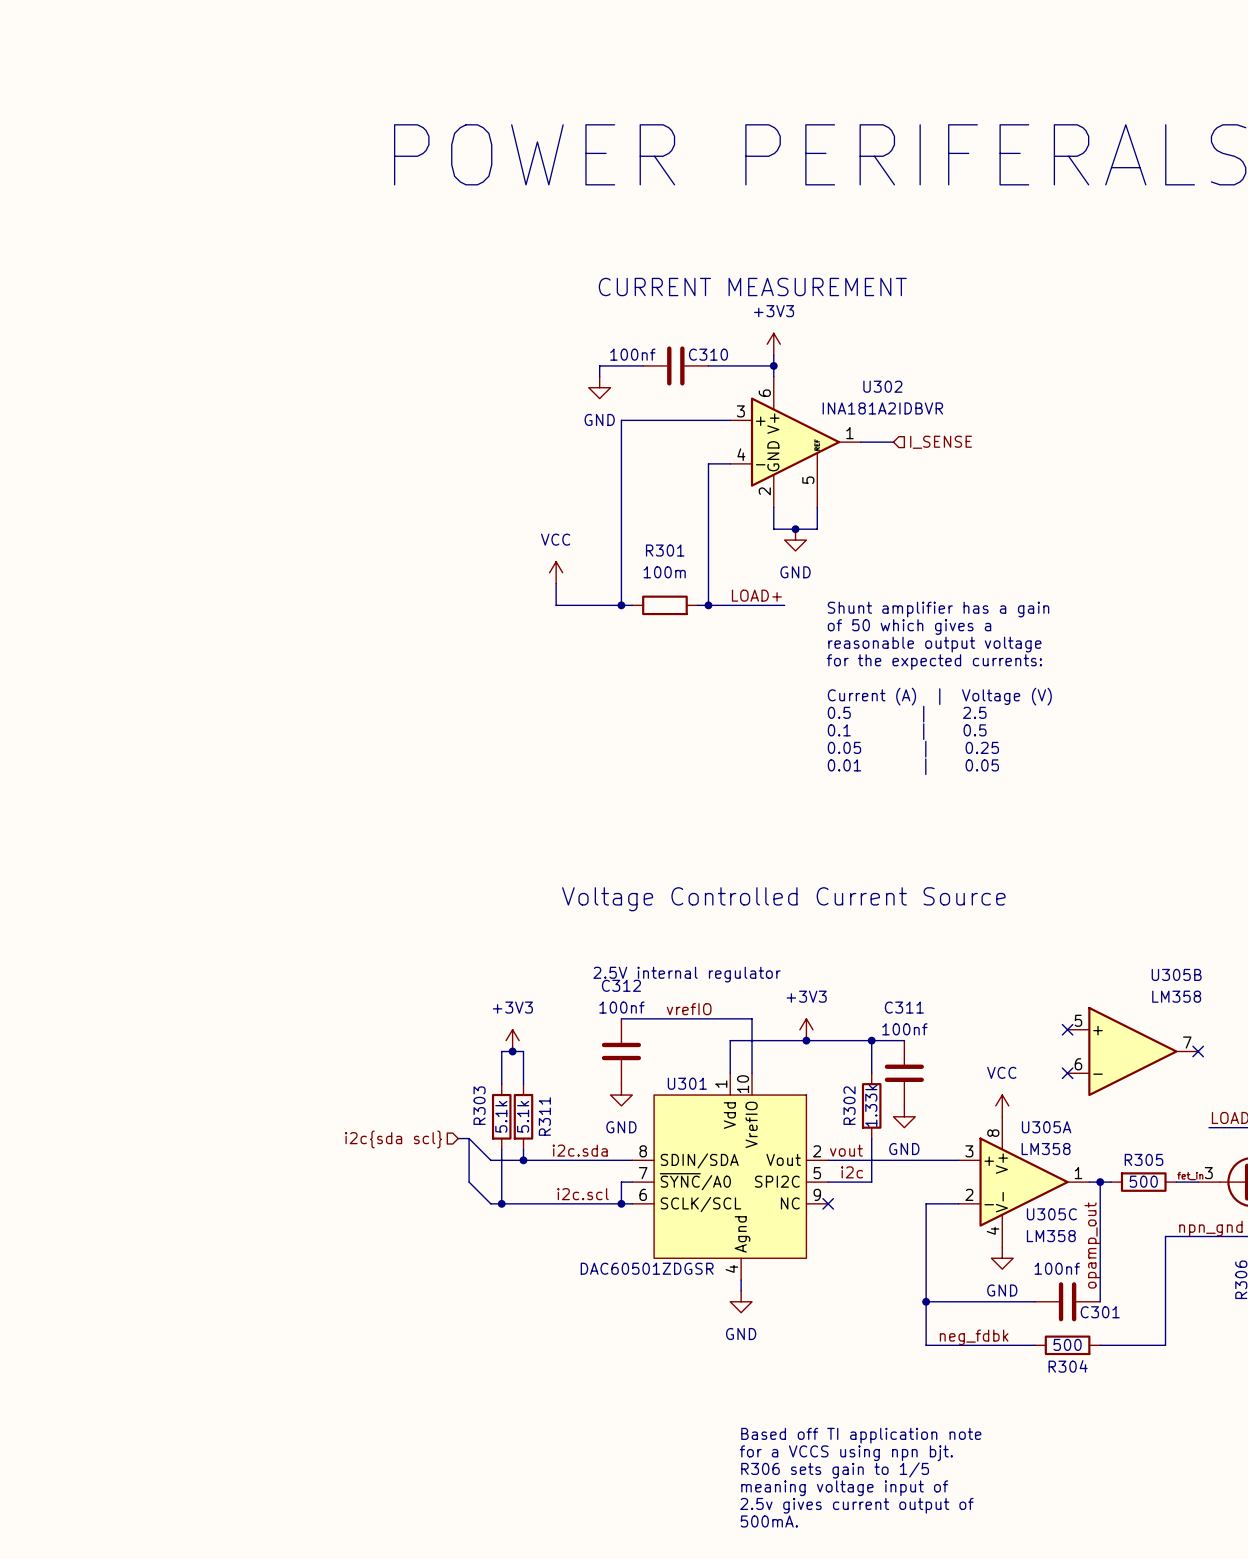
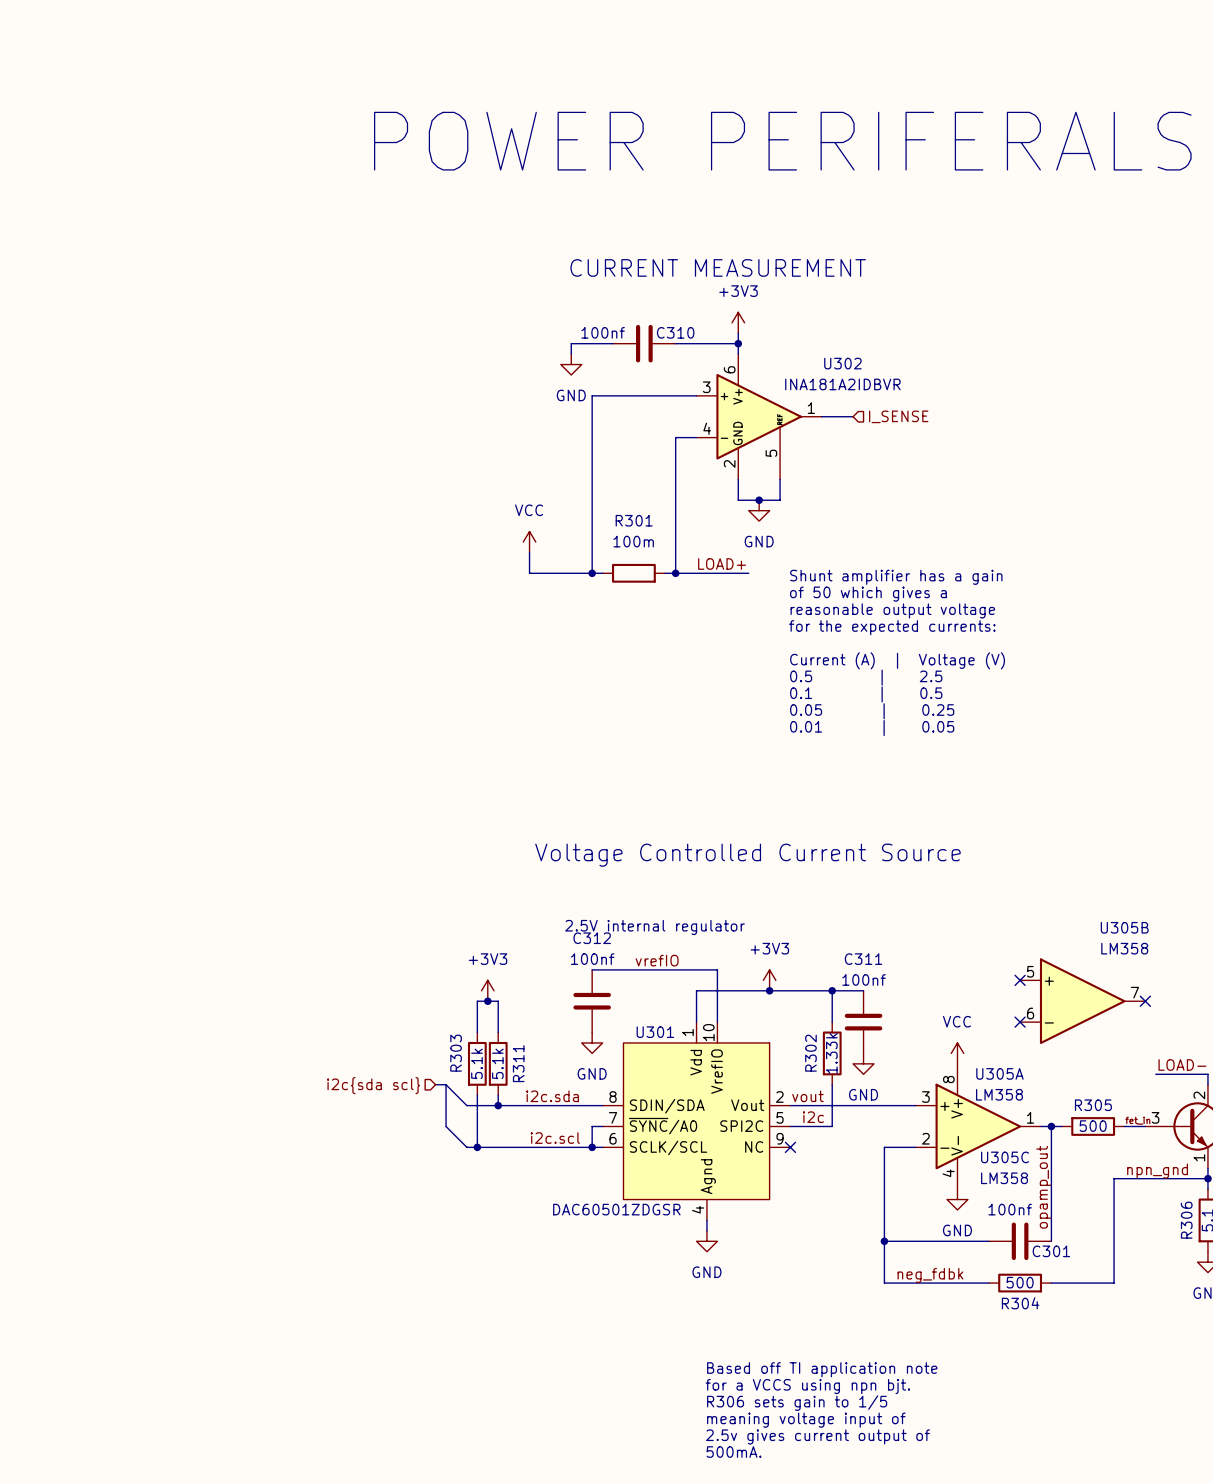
U302 symbol: [730, 376, 861, 508] -> [696, 354, 822, 480]

